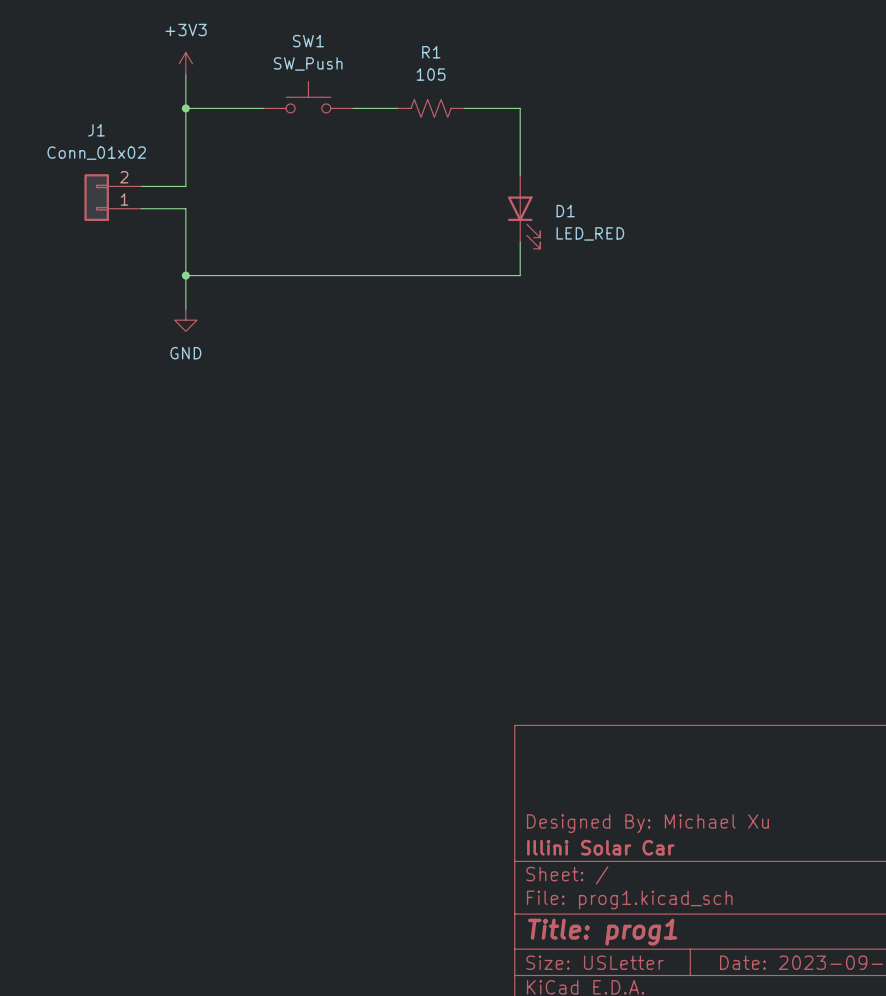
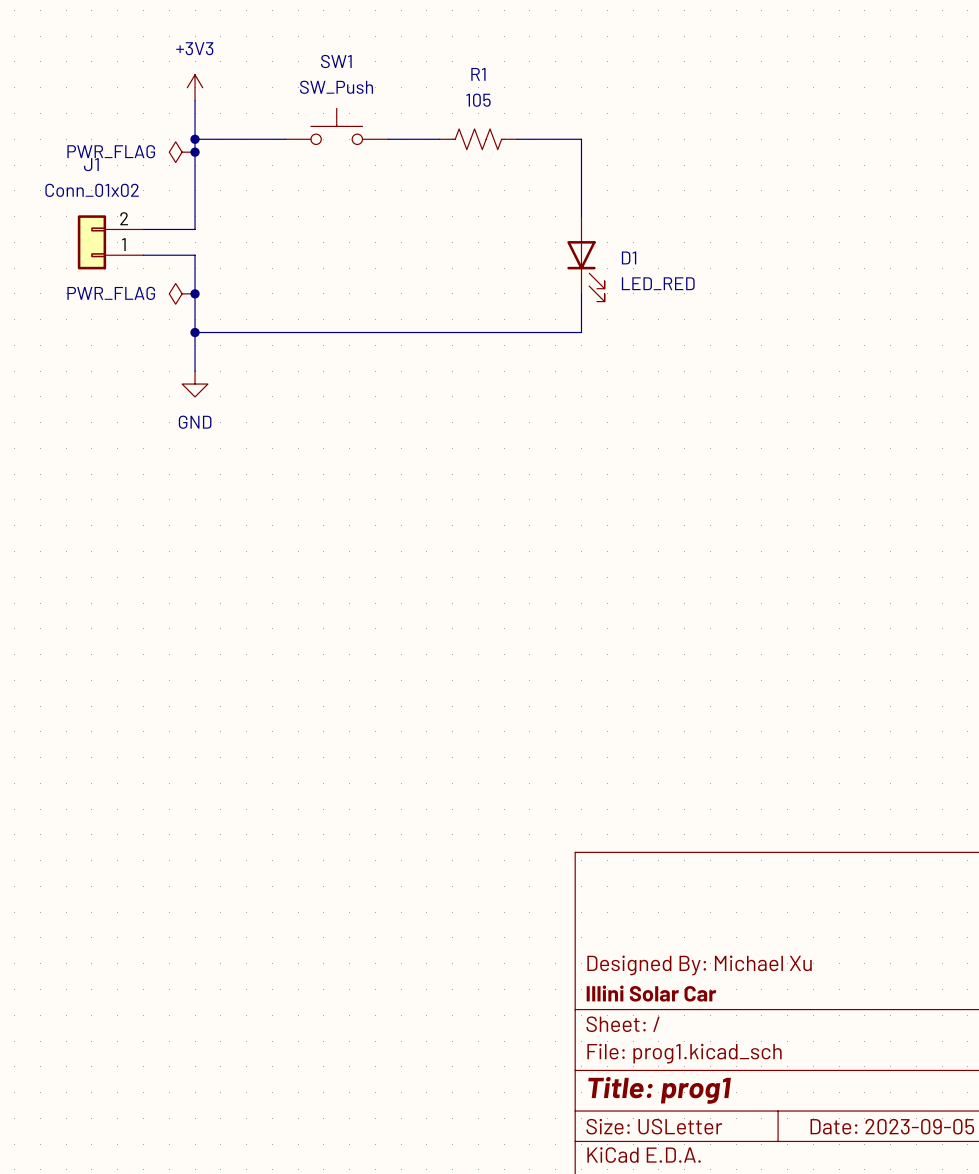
power symbol: none -> PWR_FLAG (182, 152)
junction: none -> (195, 152)
power symbol: none -> PWR_FLAG (182, 293)
junction: none -> (195, 293)

